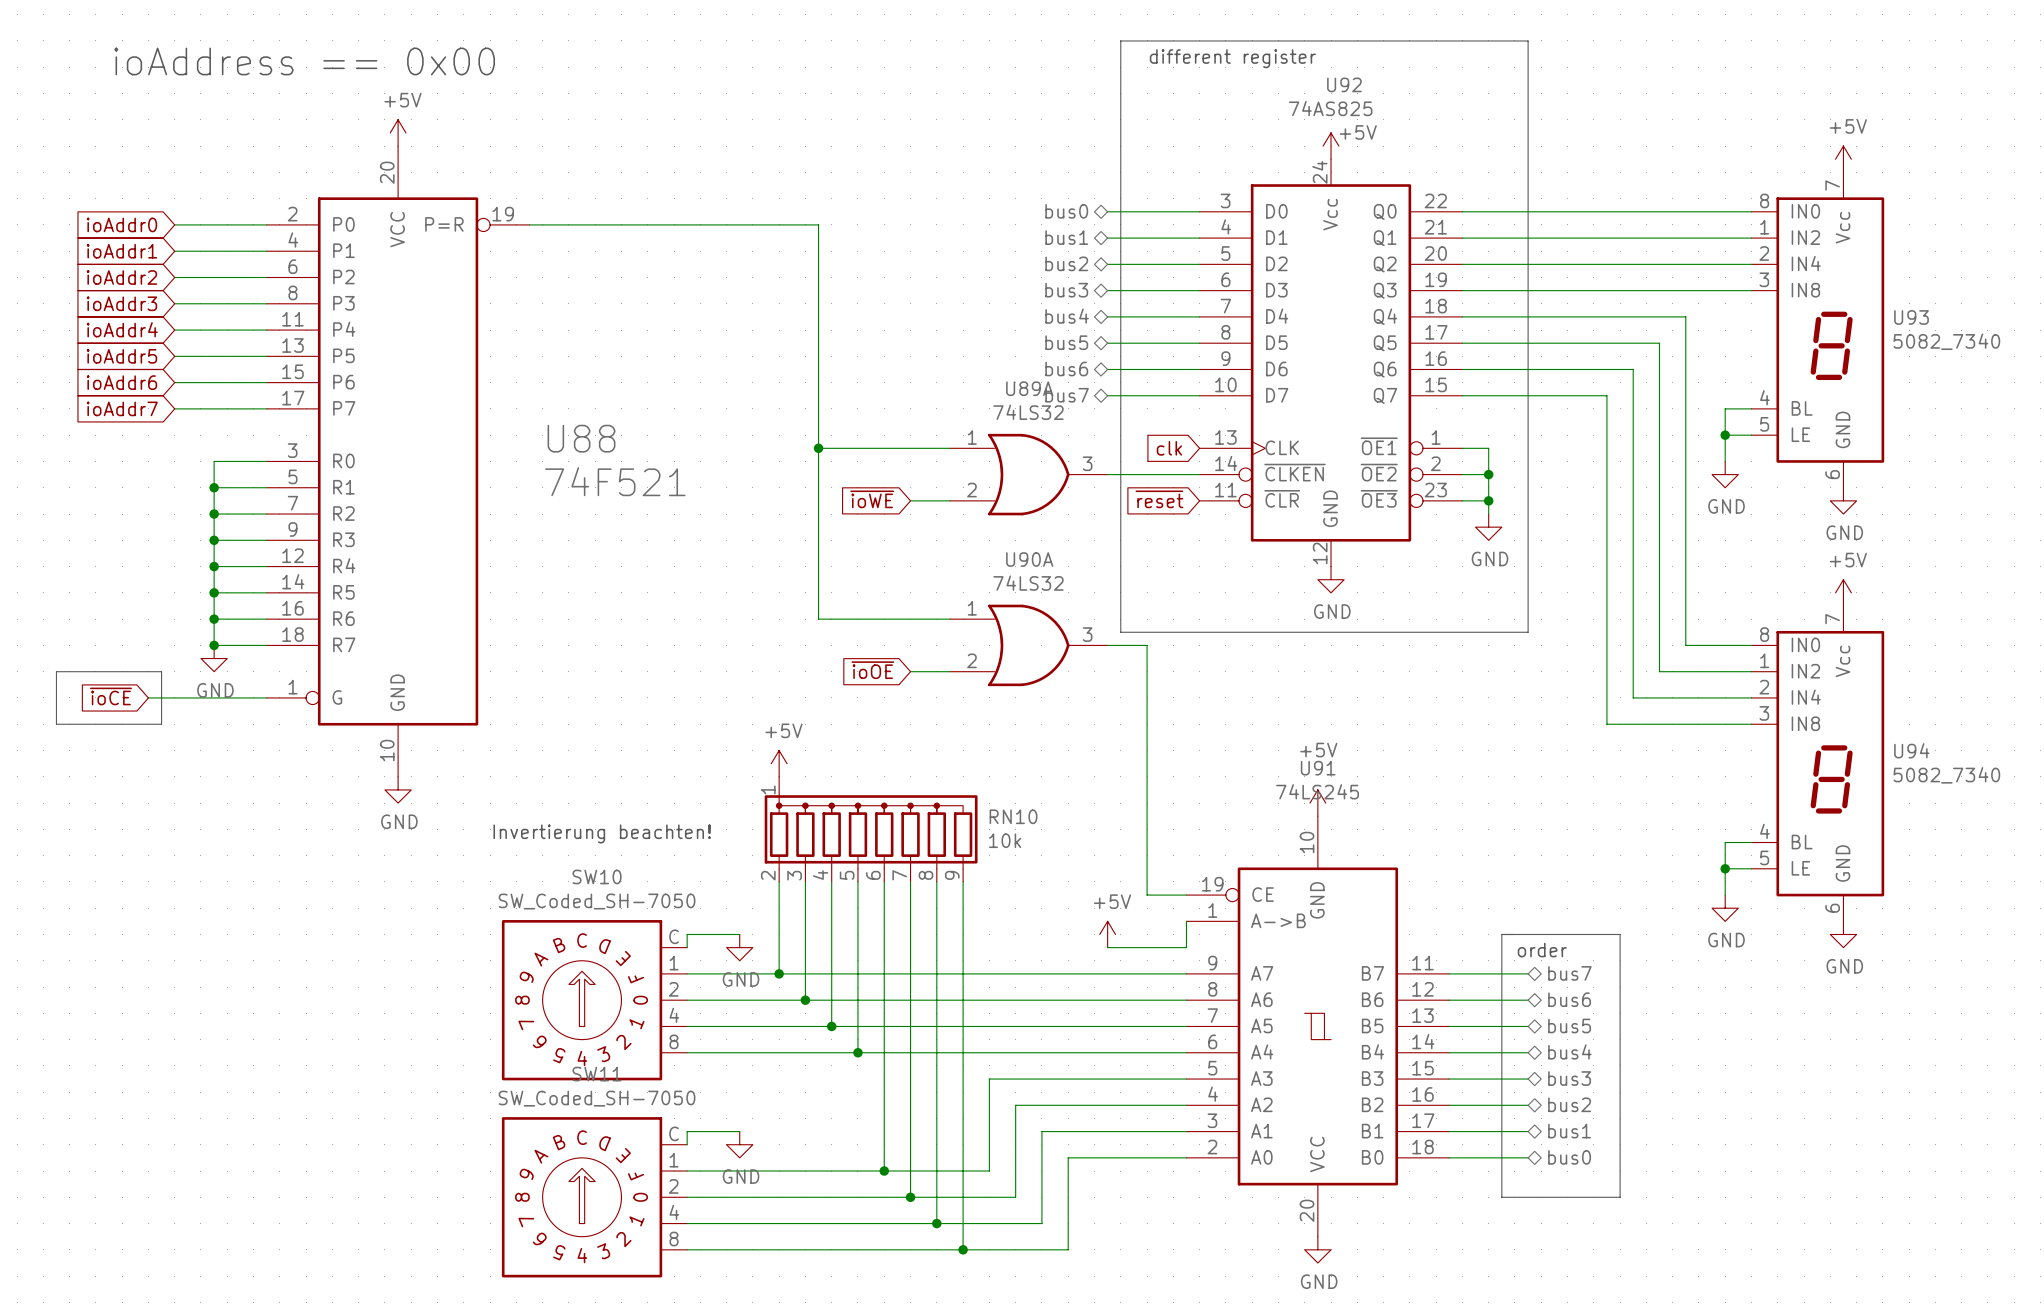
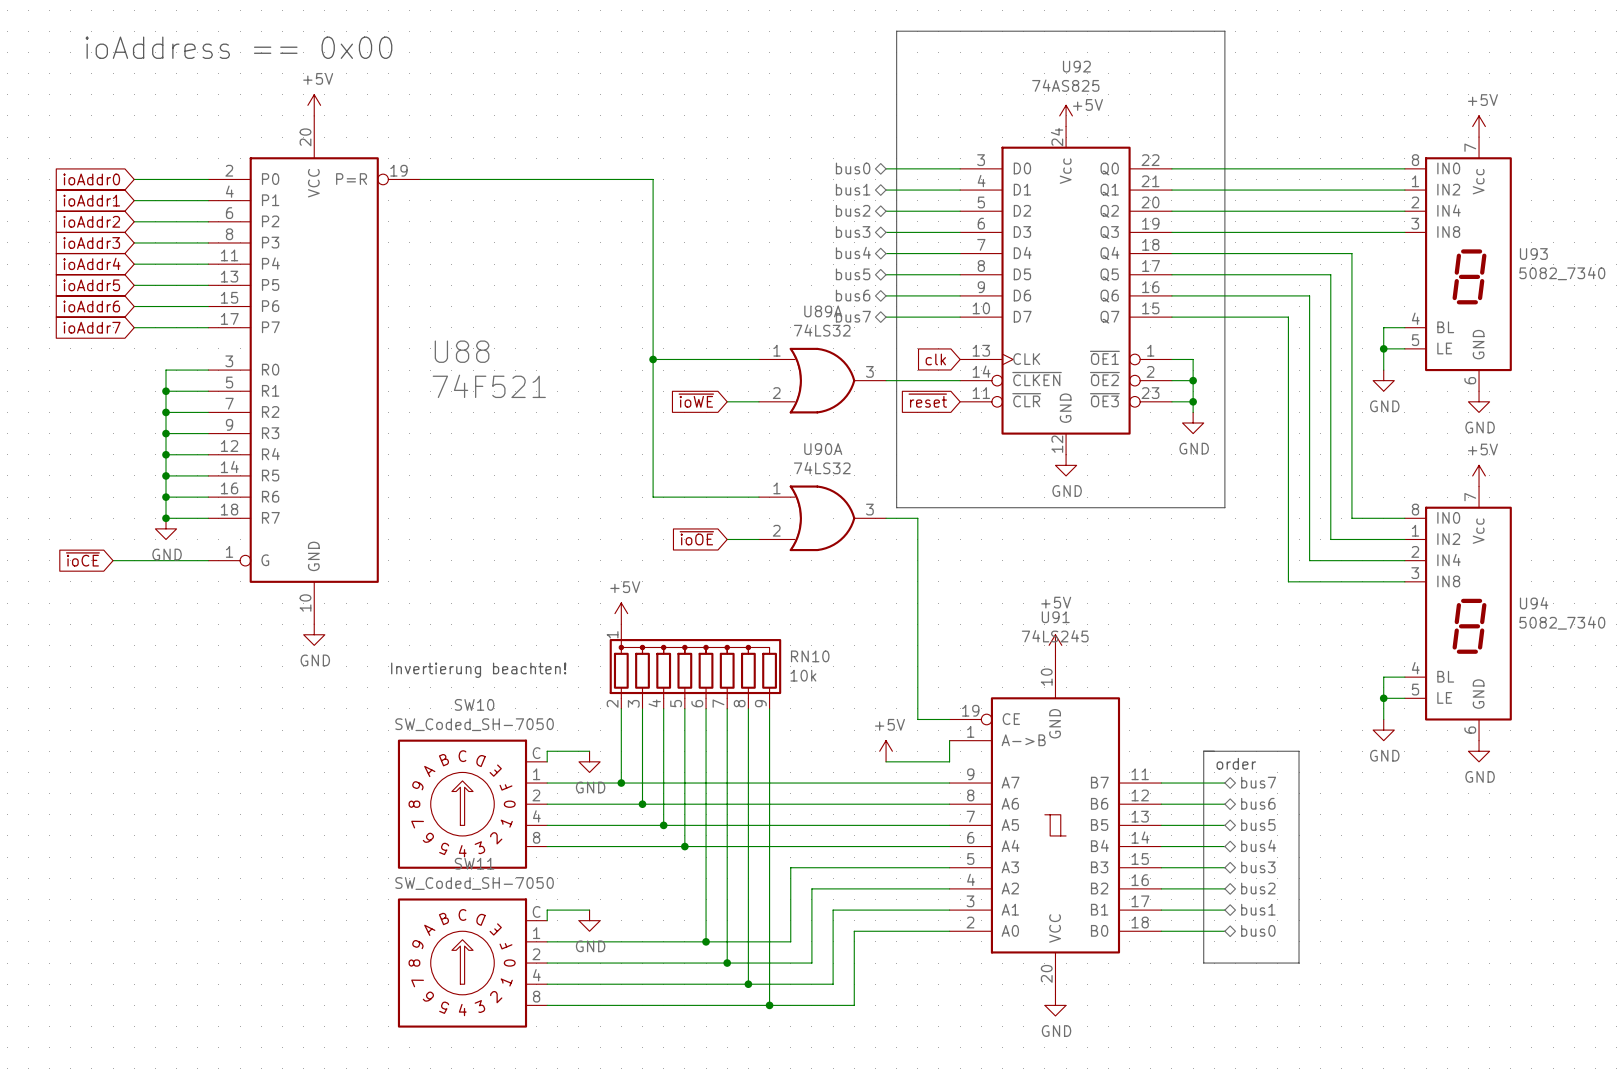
text: different register (1232, 58) -> none
line: (56, 671) (161, 671) (161, 724) (56, 724) (56, 671) -> none

